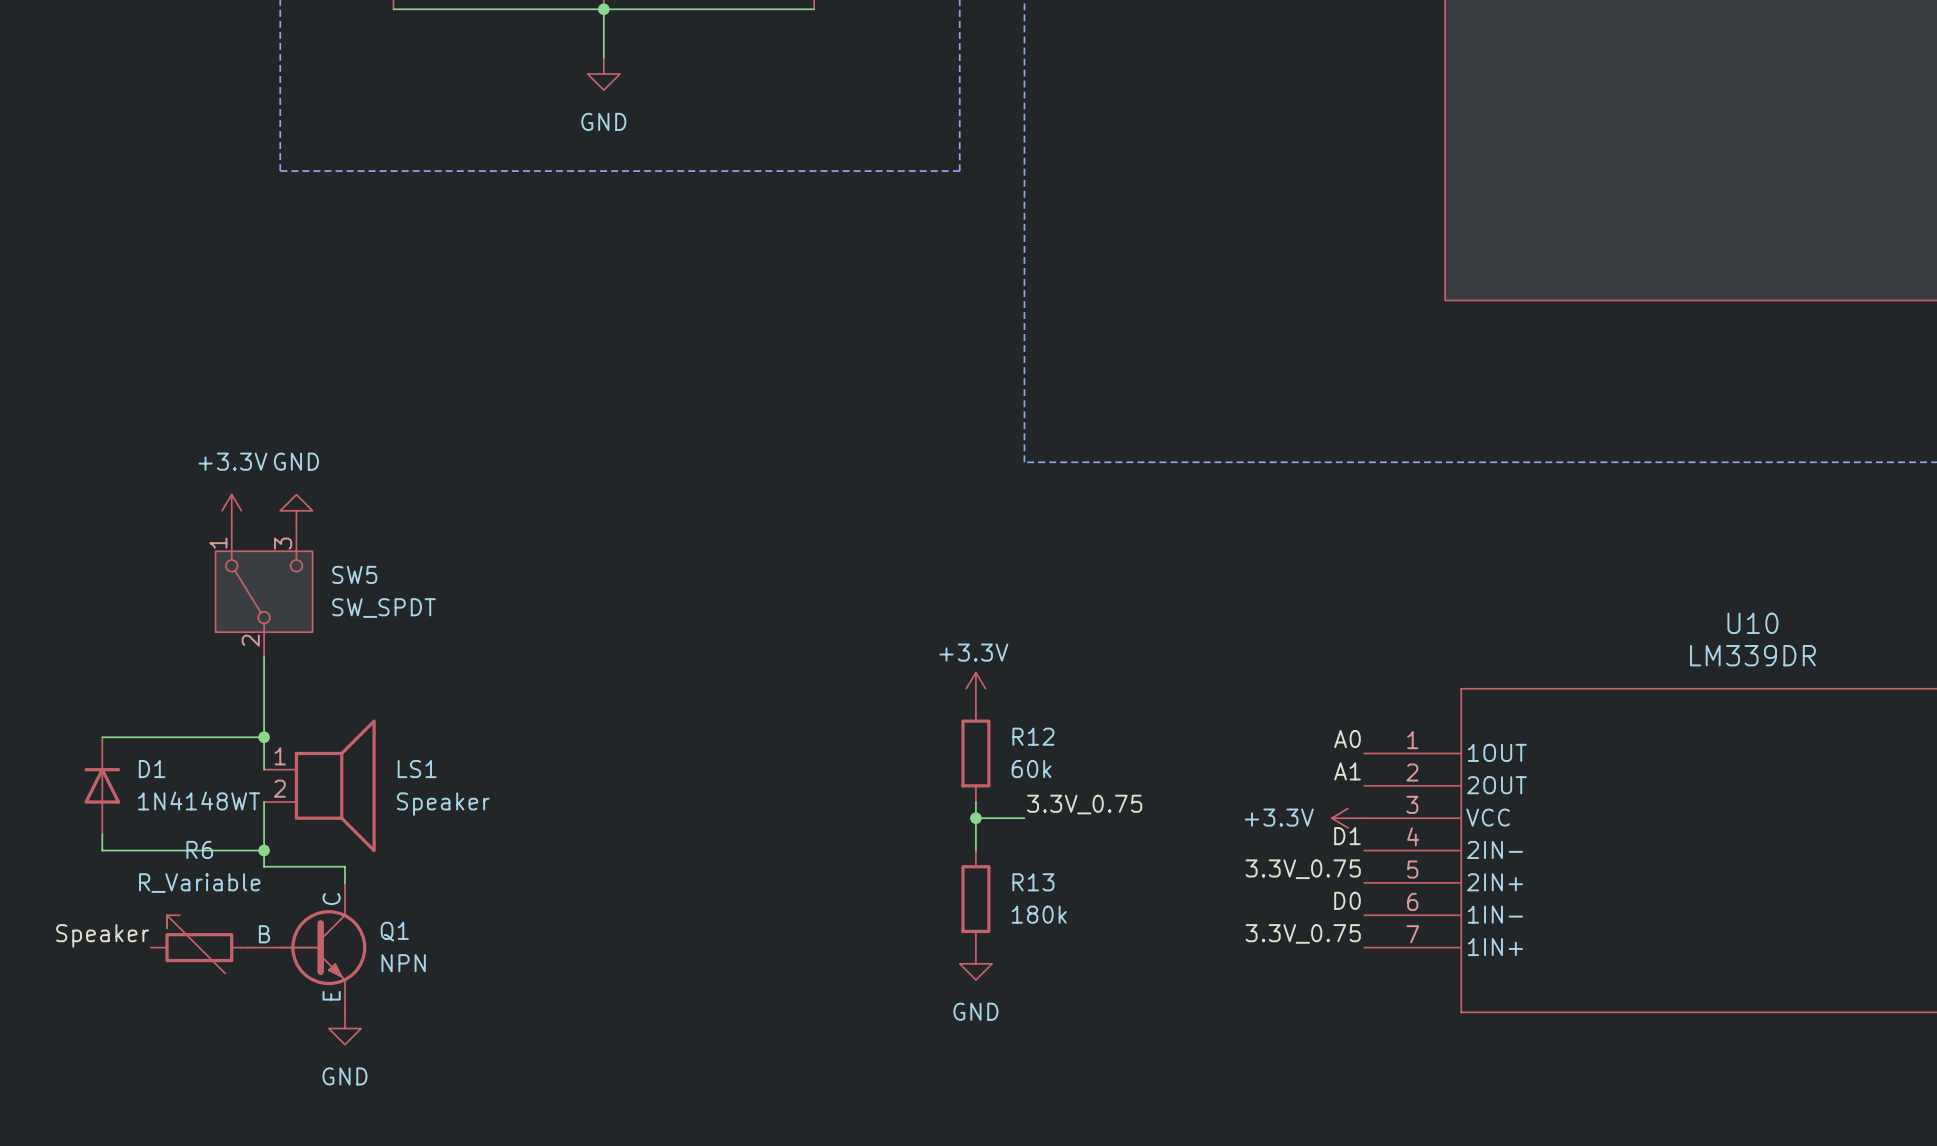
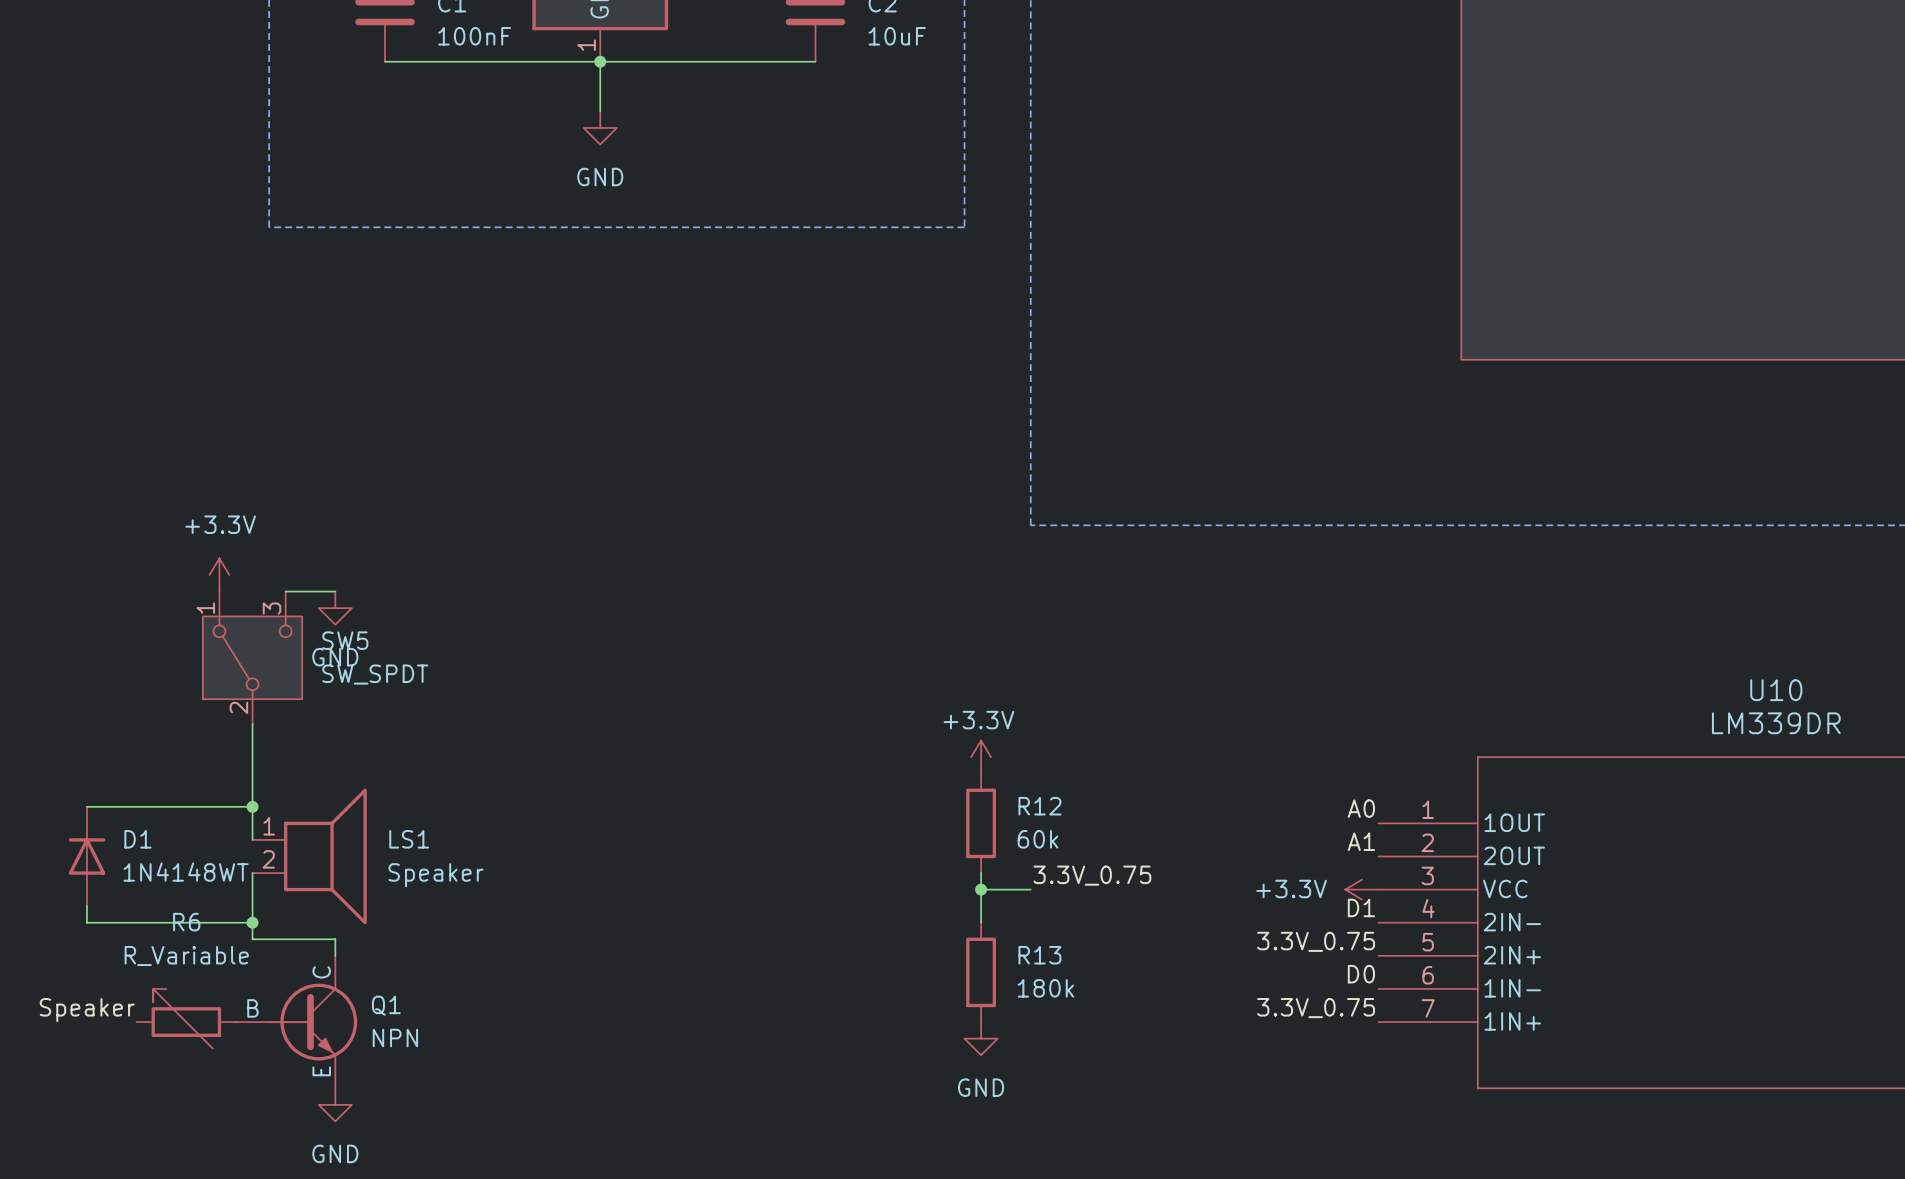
power symbol rotation: 0° (296, 510) -> 180° (335, 608)
power symbol position: GND (296, 510) -> GND (335, 608)
wire: none -> (285, 591) (335, 591)

